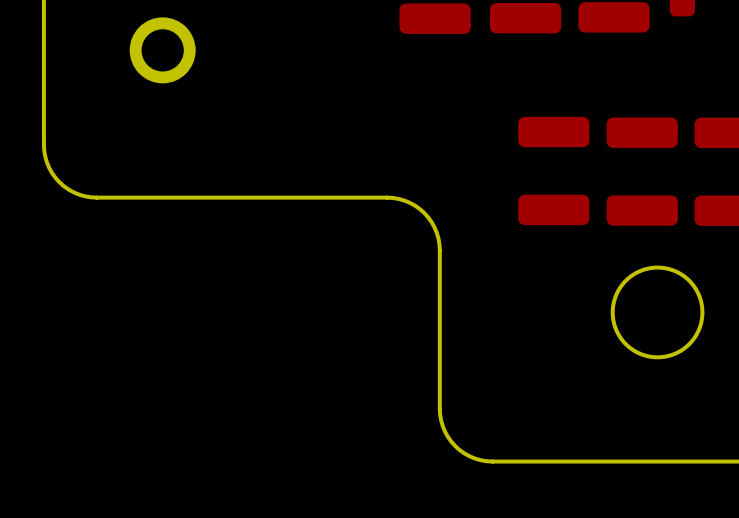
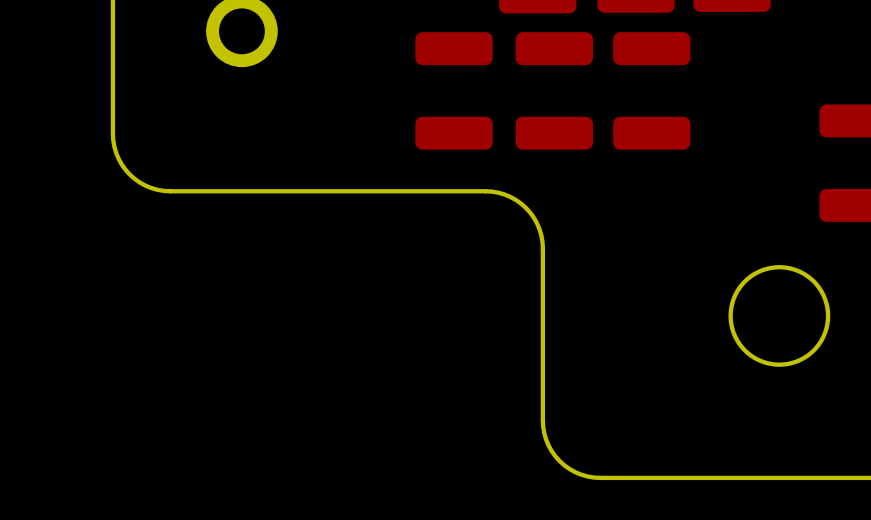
part: none -> (454, 90)
part: none -> (554, 90)
part: none -> (651, 90)
part: (553, 170) -> none
part: (642, 171) -> none

